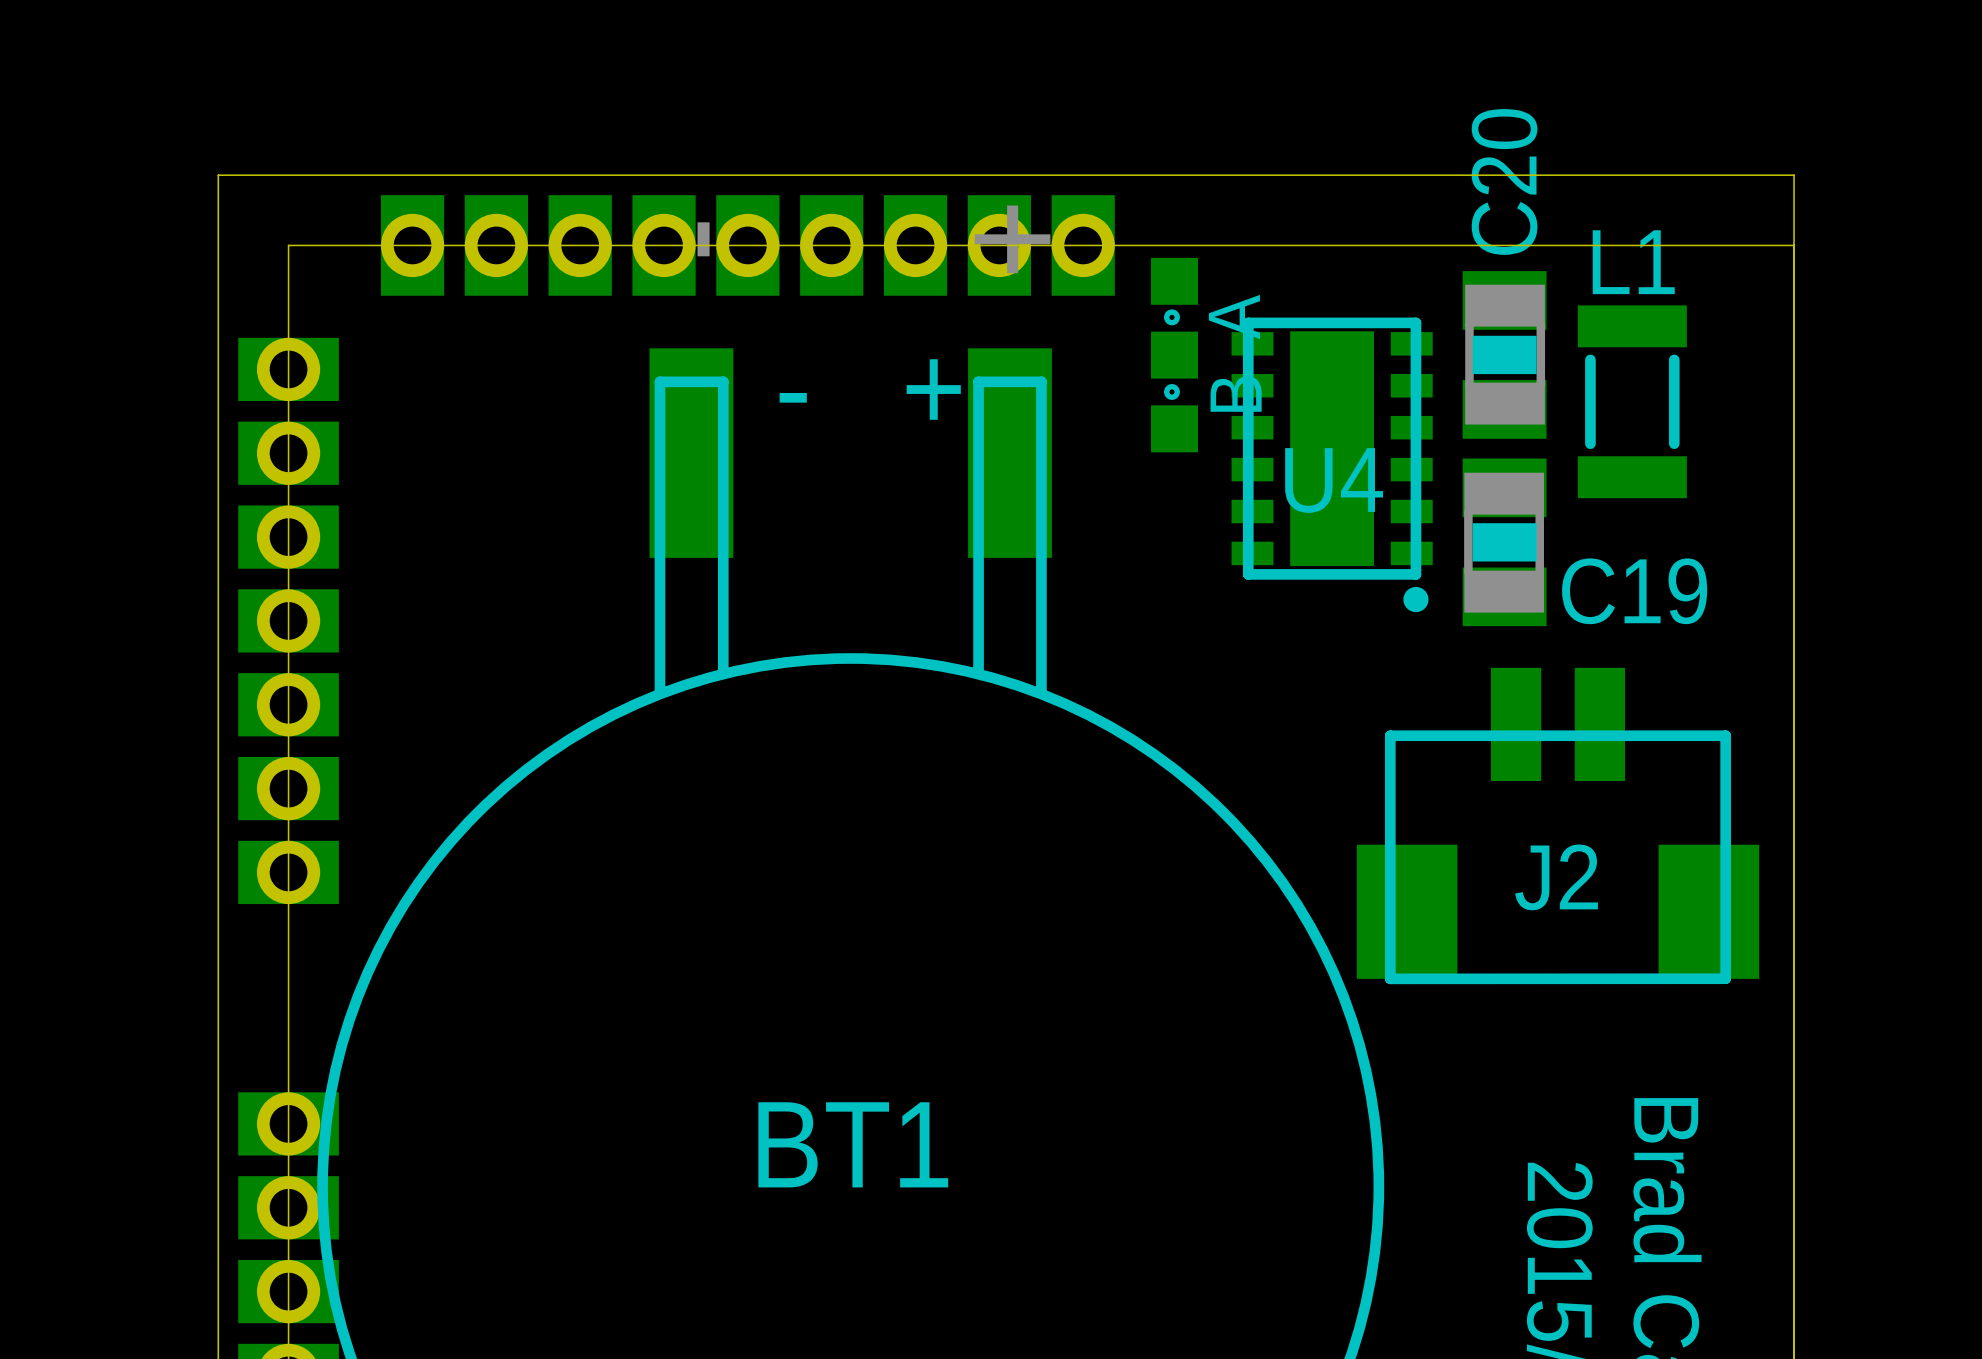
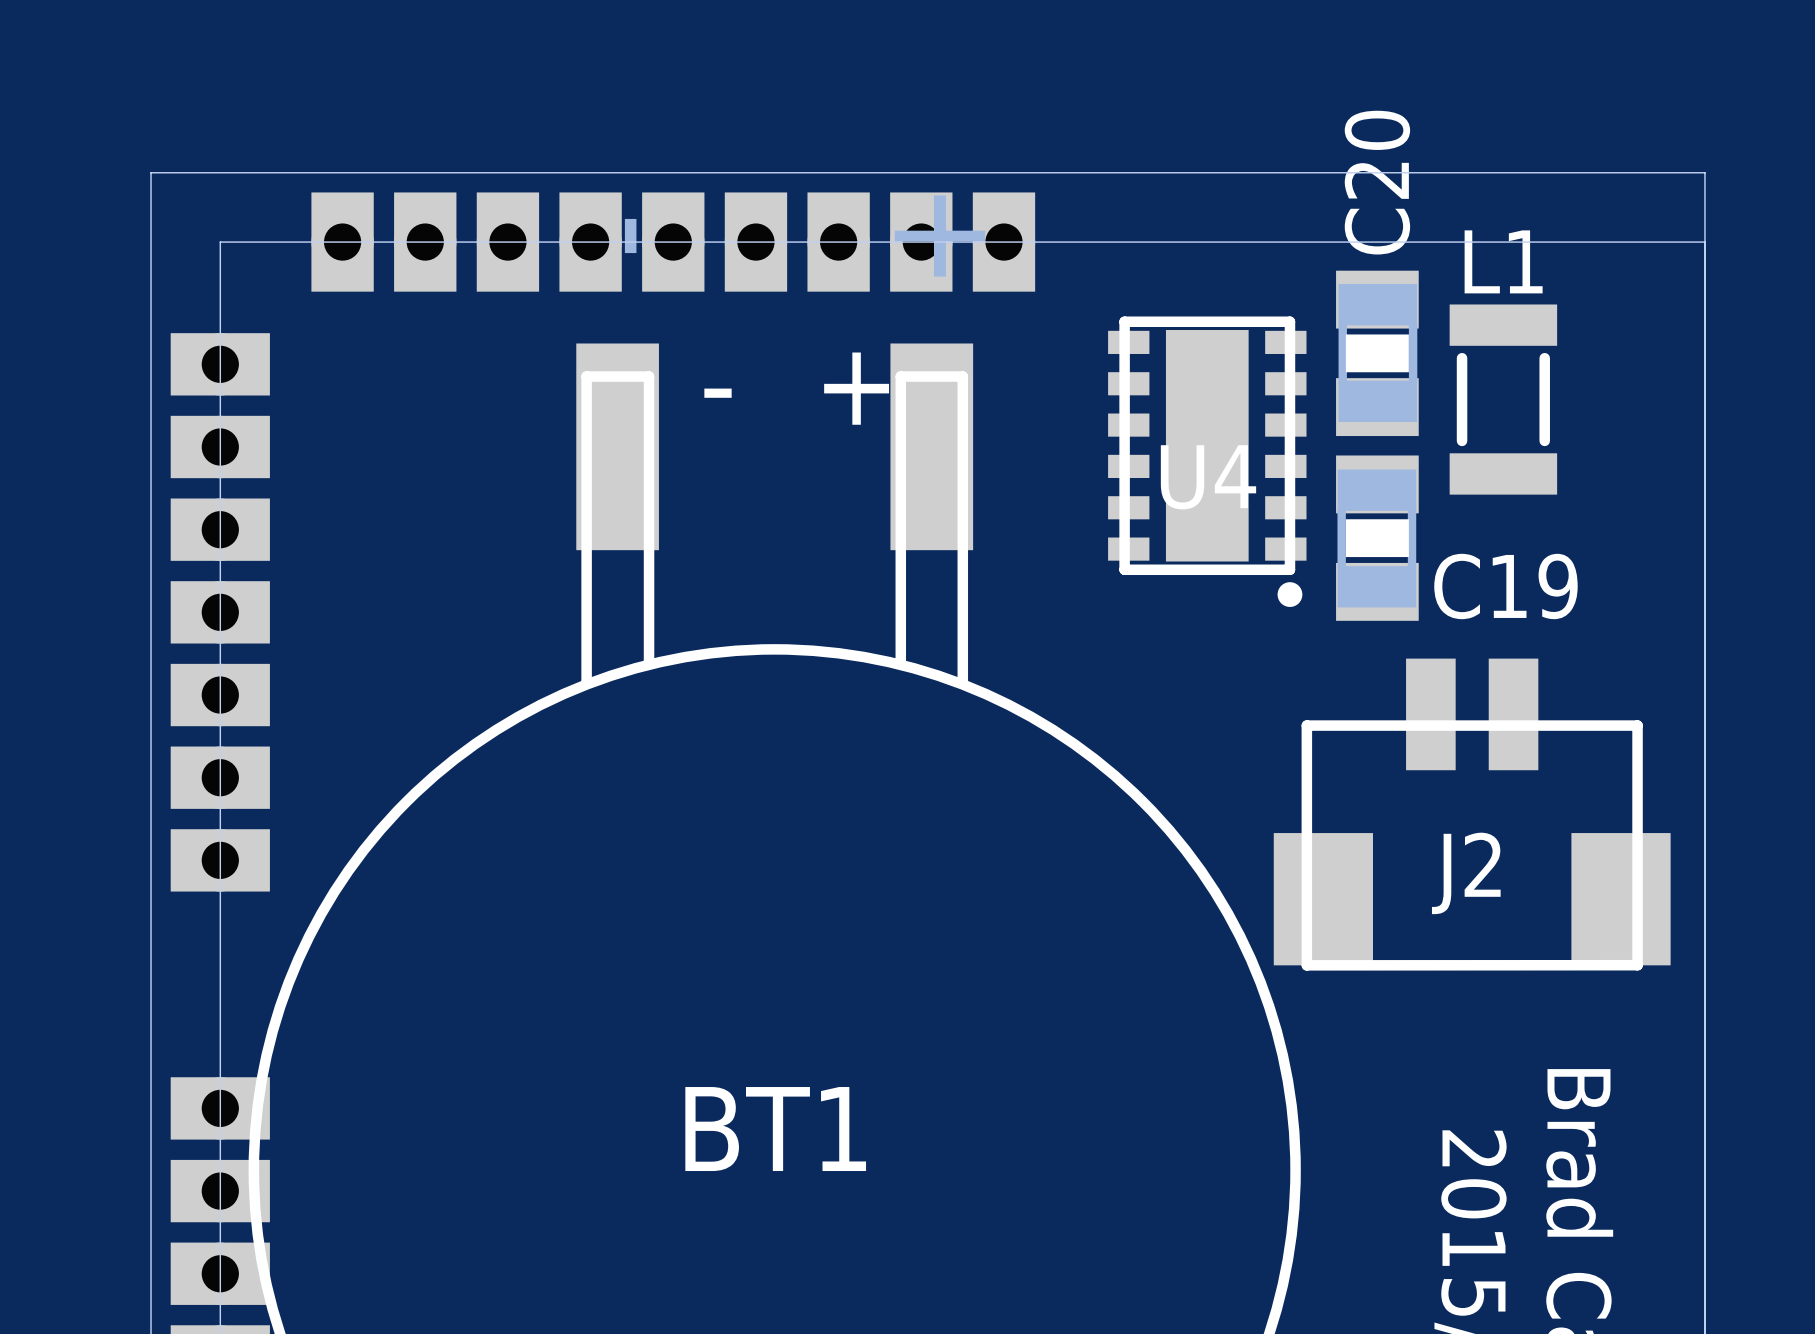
C20 position: (1504, 354) -> (1377, 353)
part: (1174, 355) -> none
L1 position: (1632, 401) -> (1503, 399)
U4 position: (1332, 464) -> (1207, 461)
C19 position: (1504, 542) -> (1377, 538)

